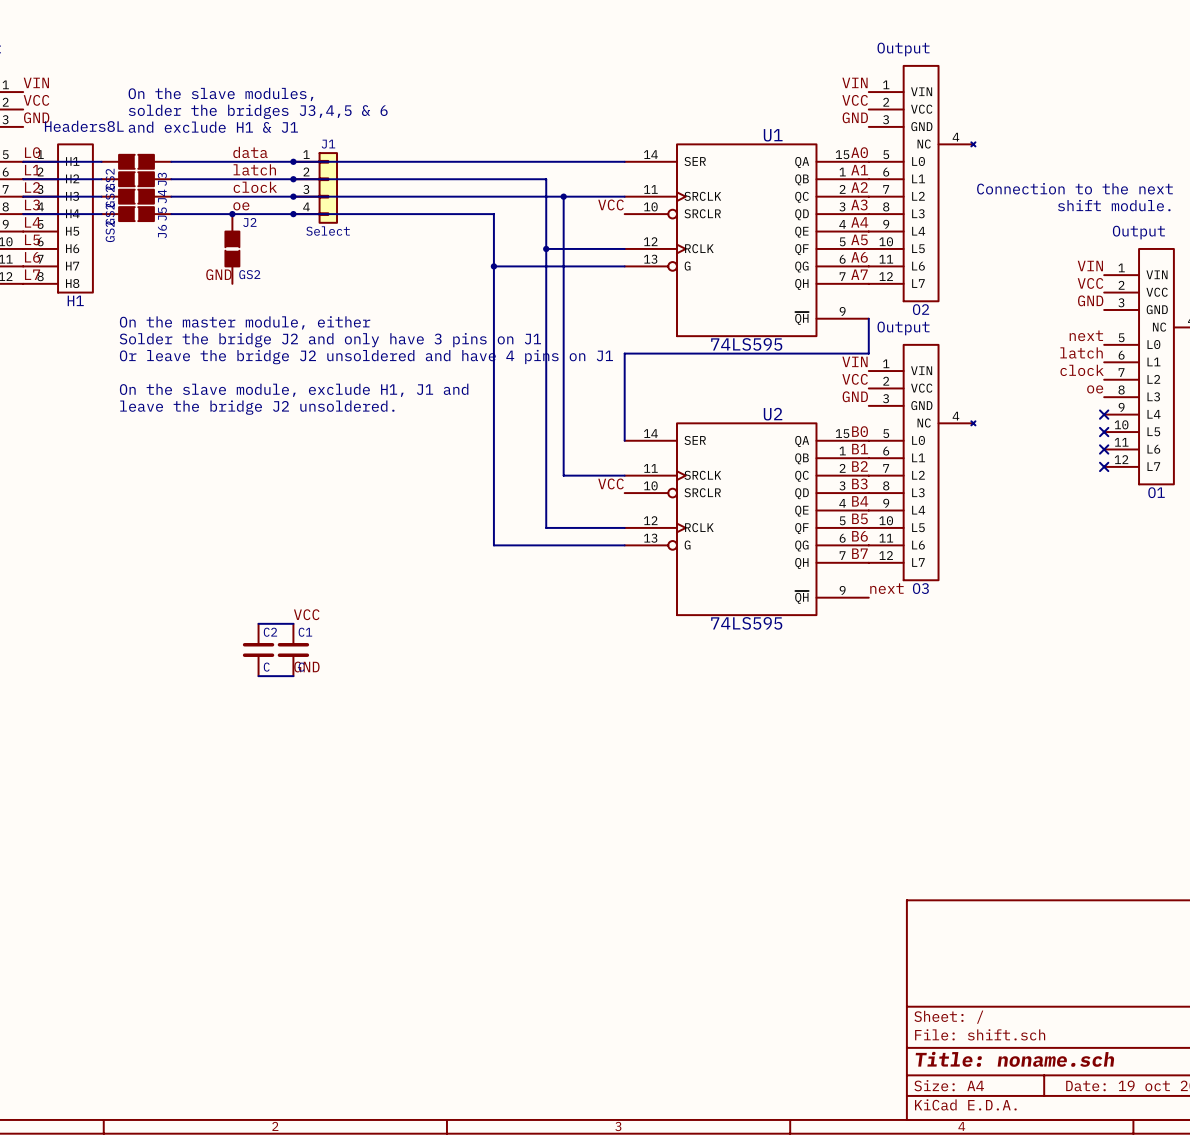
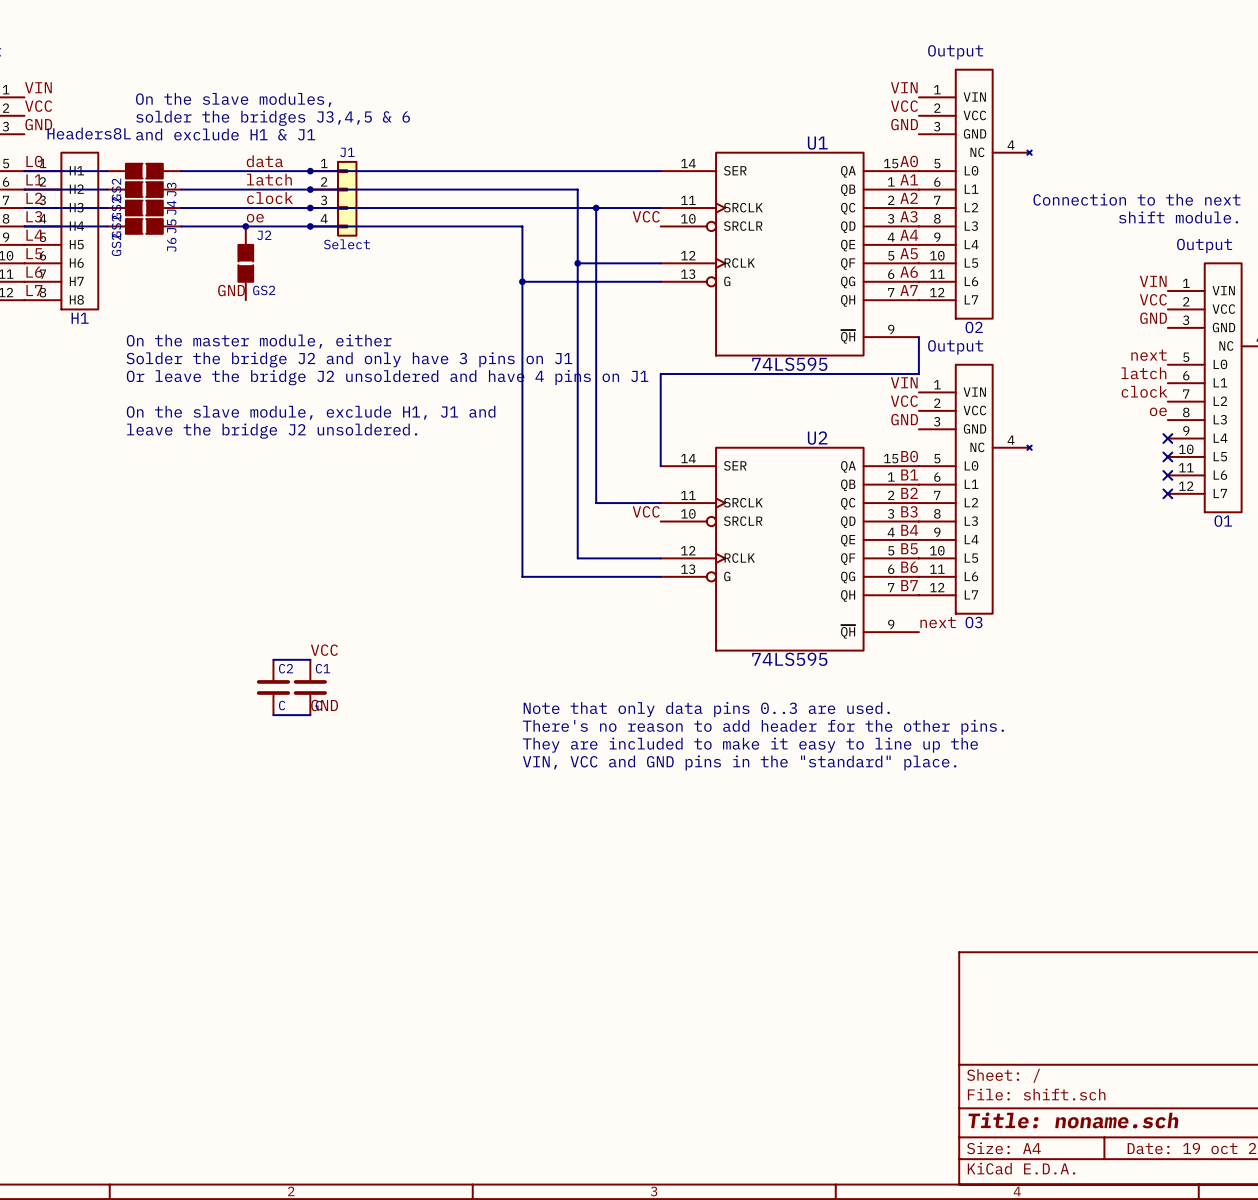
text: none -> Note that only data pins 0..3 are used. (706, 709)
text: none -> There's no reason to add header for the other pins. (763, 727)
text: none -> They are included to make it easy to line up the (750, 745)
text: none -> VIN, VCC and GND pins in the "standard" place. (739, 762)

